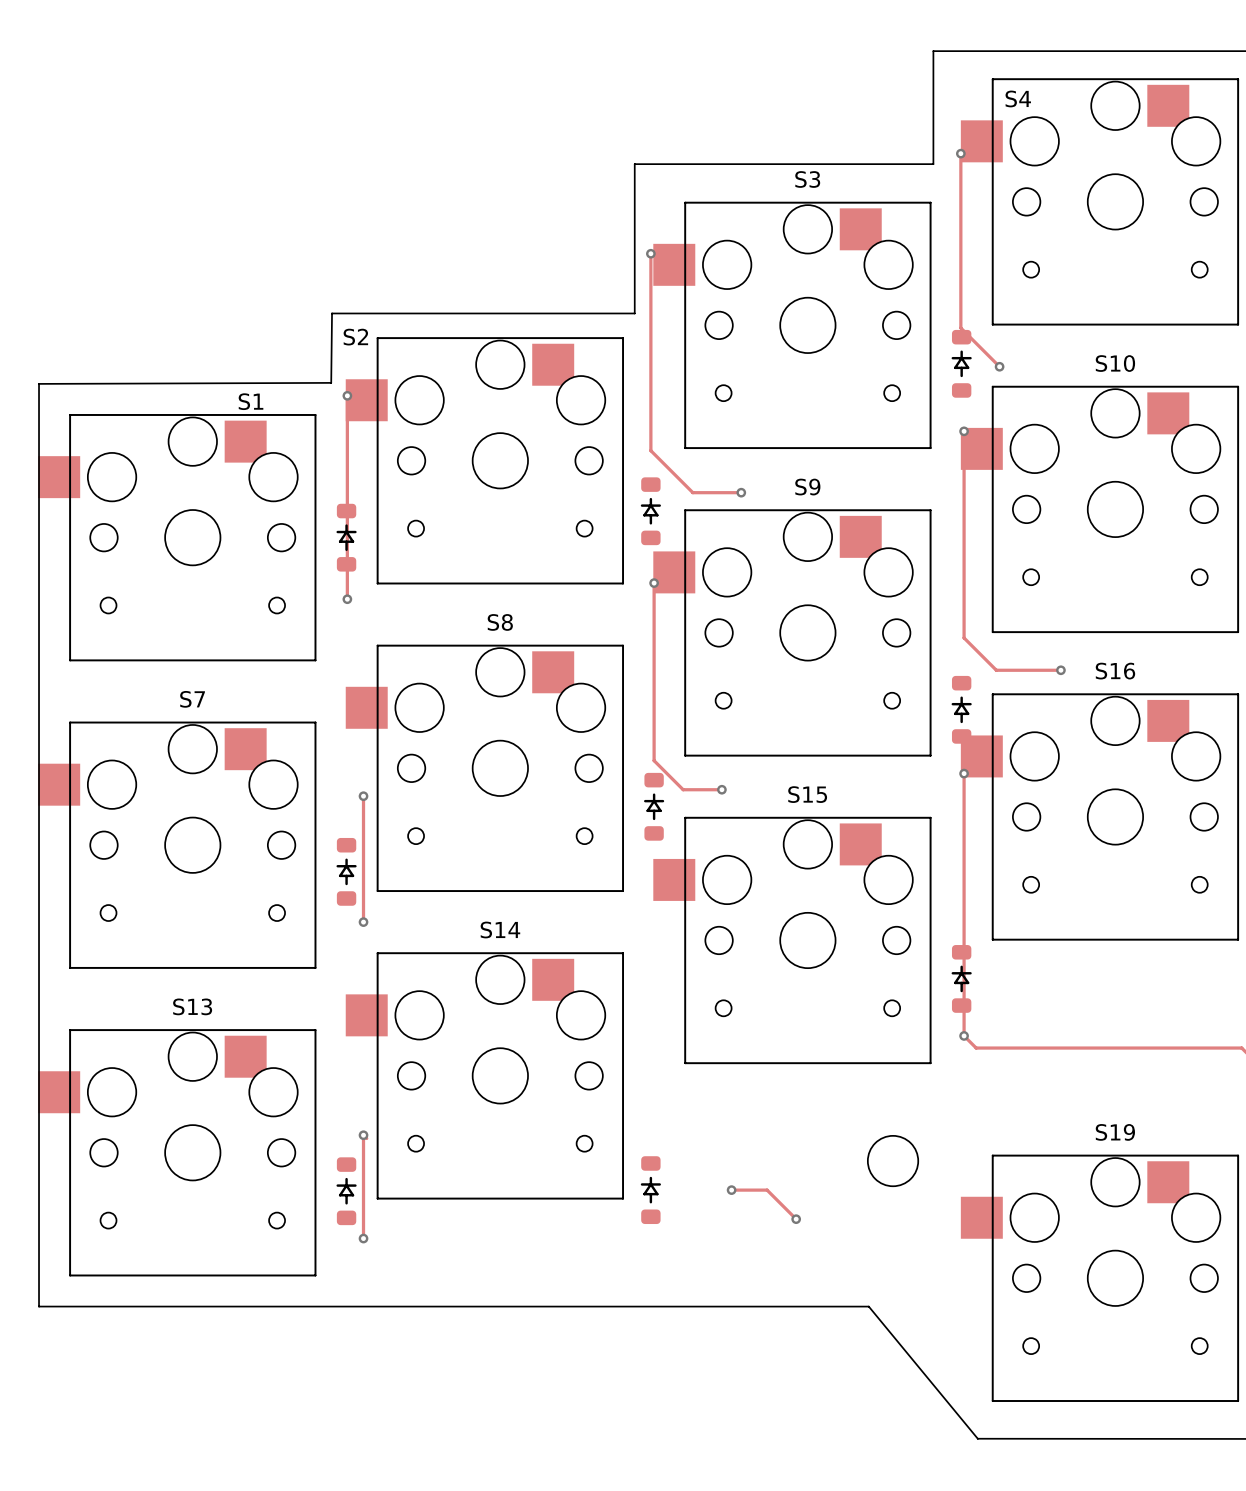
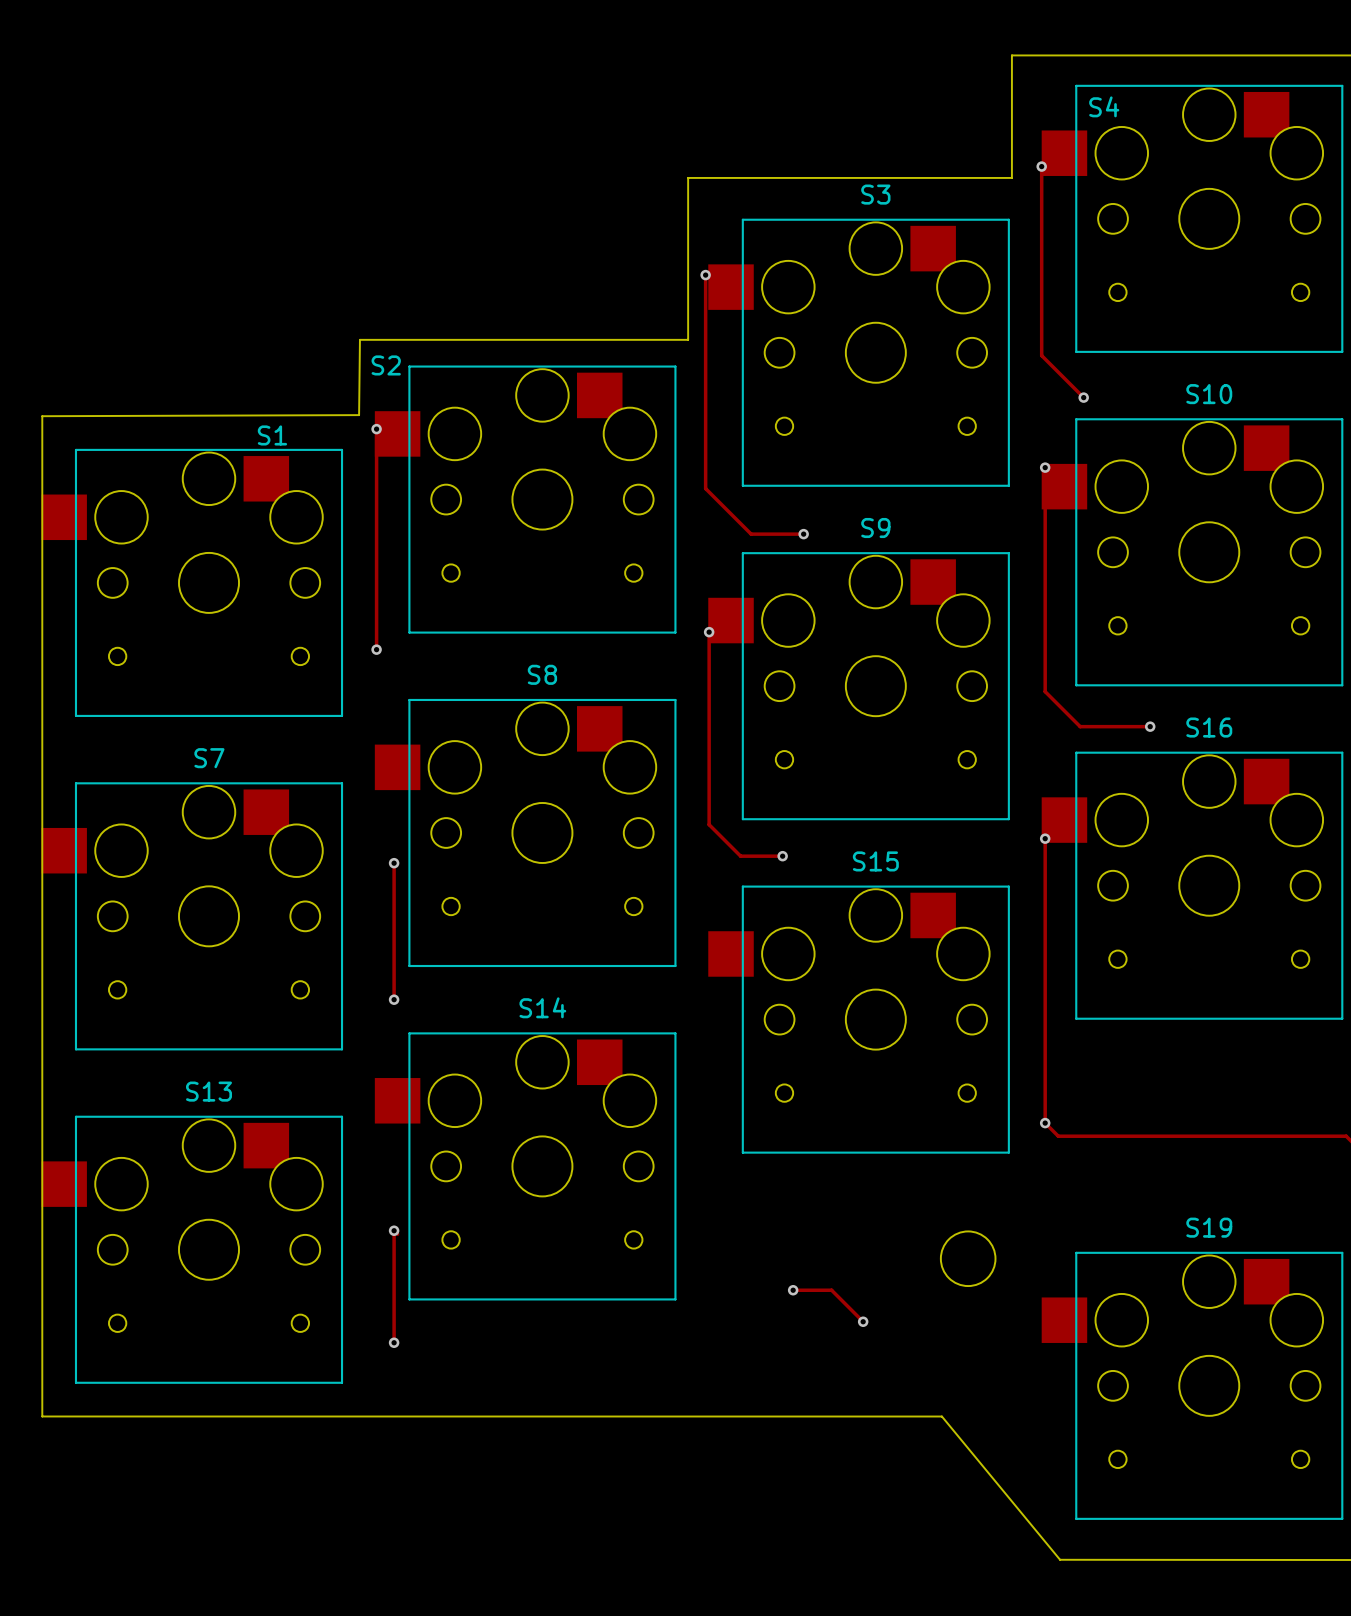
part: (961, 363) -> none
part: (650, 511) -> none
part: (346, 537) -> none
part: (961, 709) -> none
part: (654, 806) -> none
part: (346, 871) -> none
part: (961, 978) -> none
part: (650, 1190) -> none
part: (346, 1191) -> none

